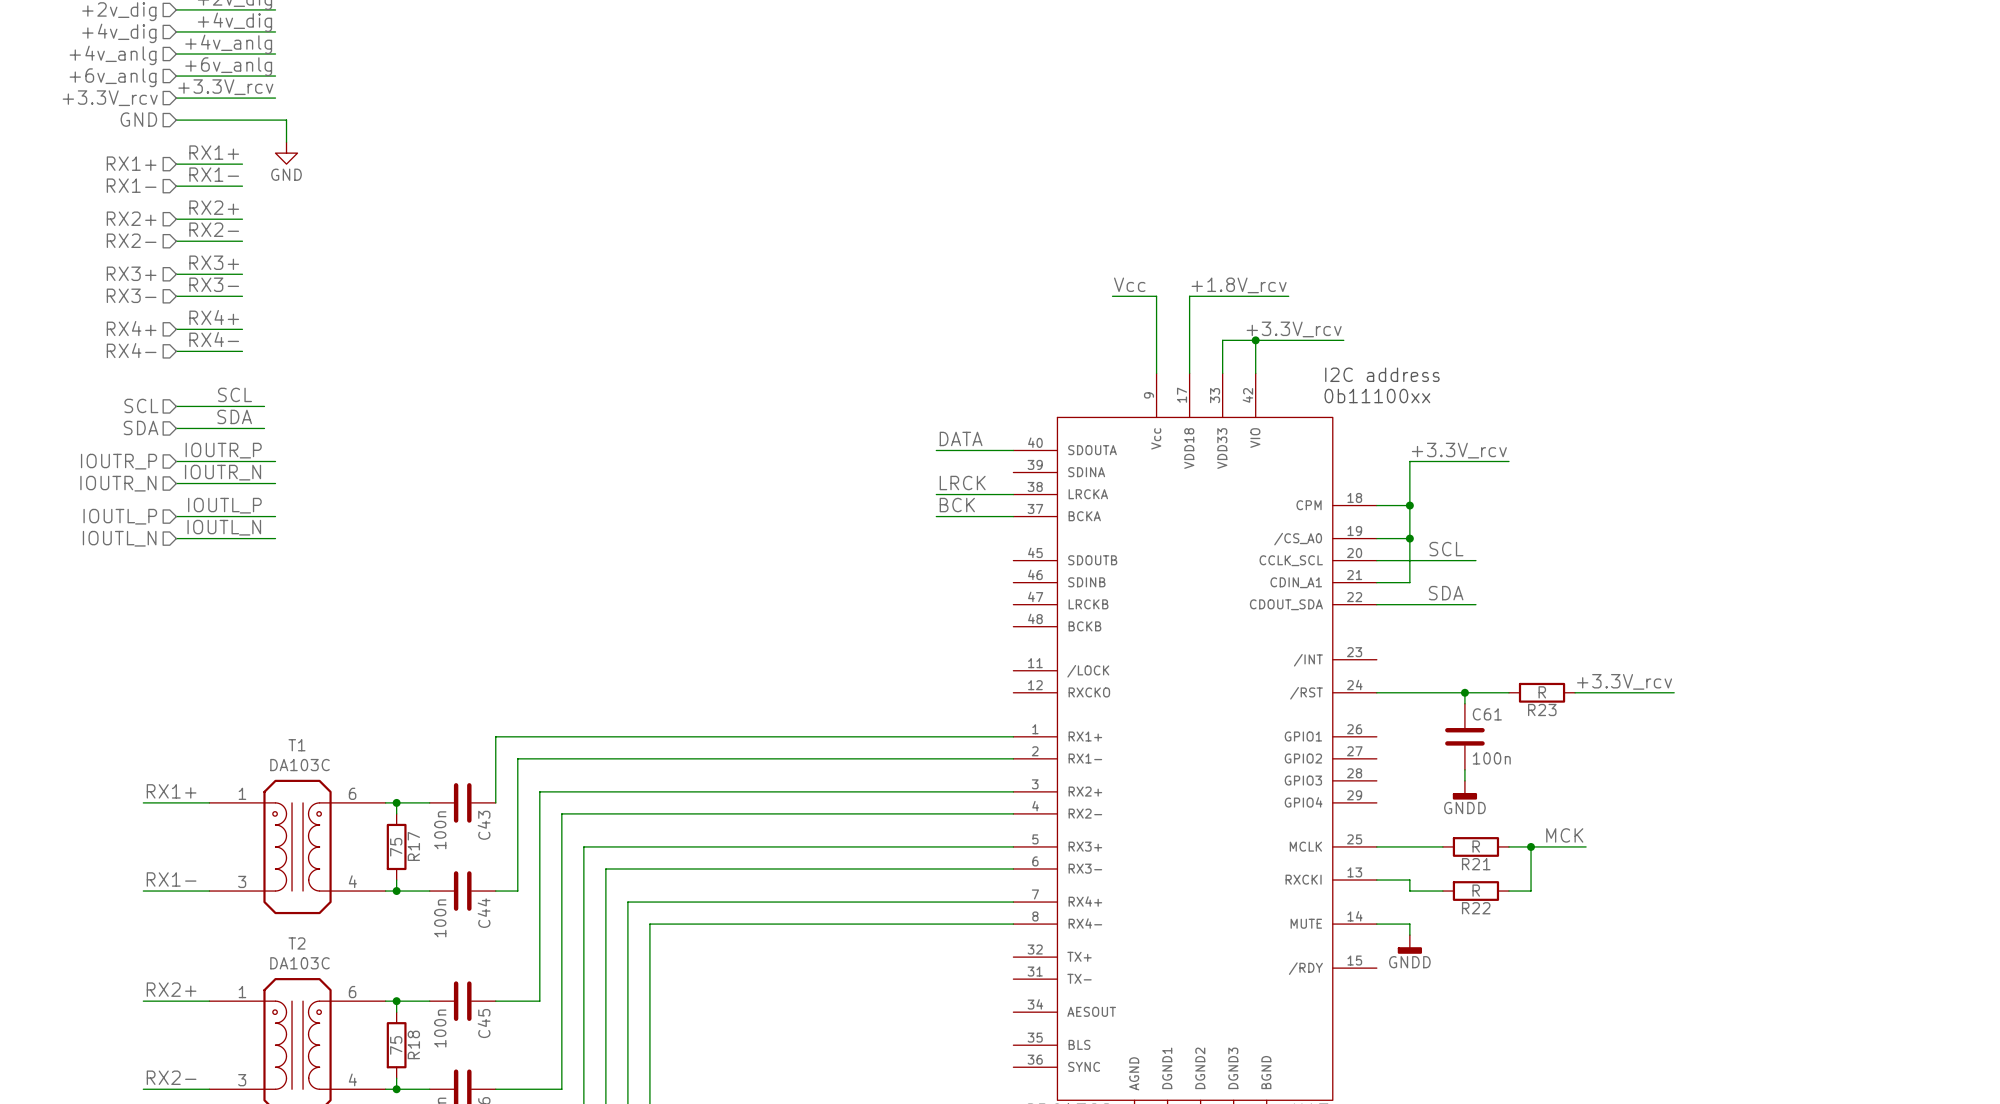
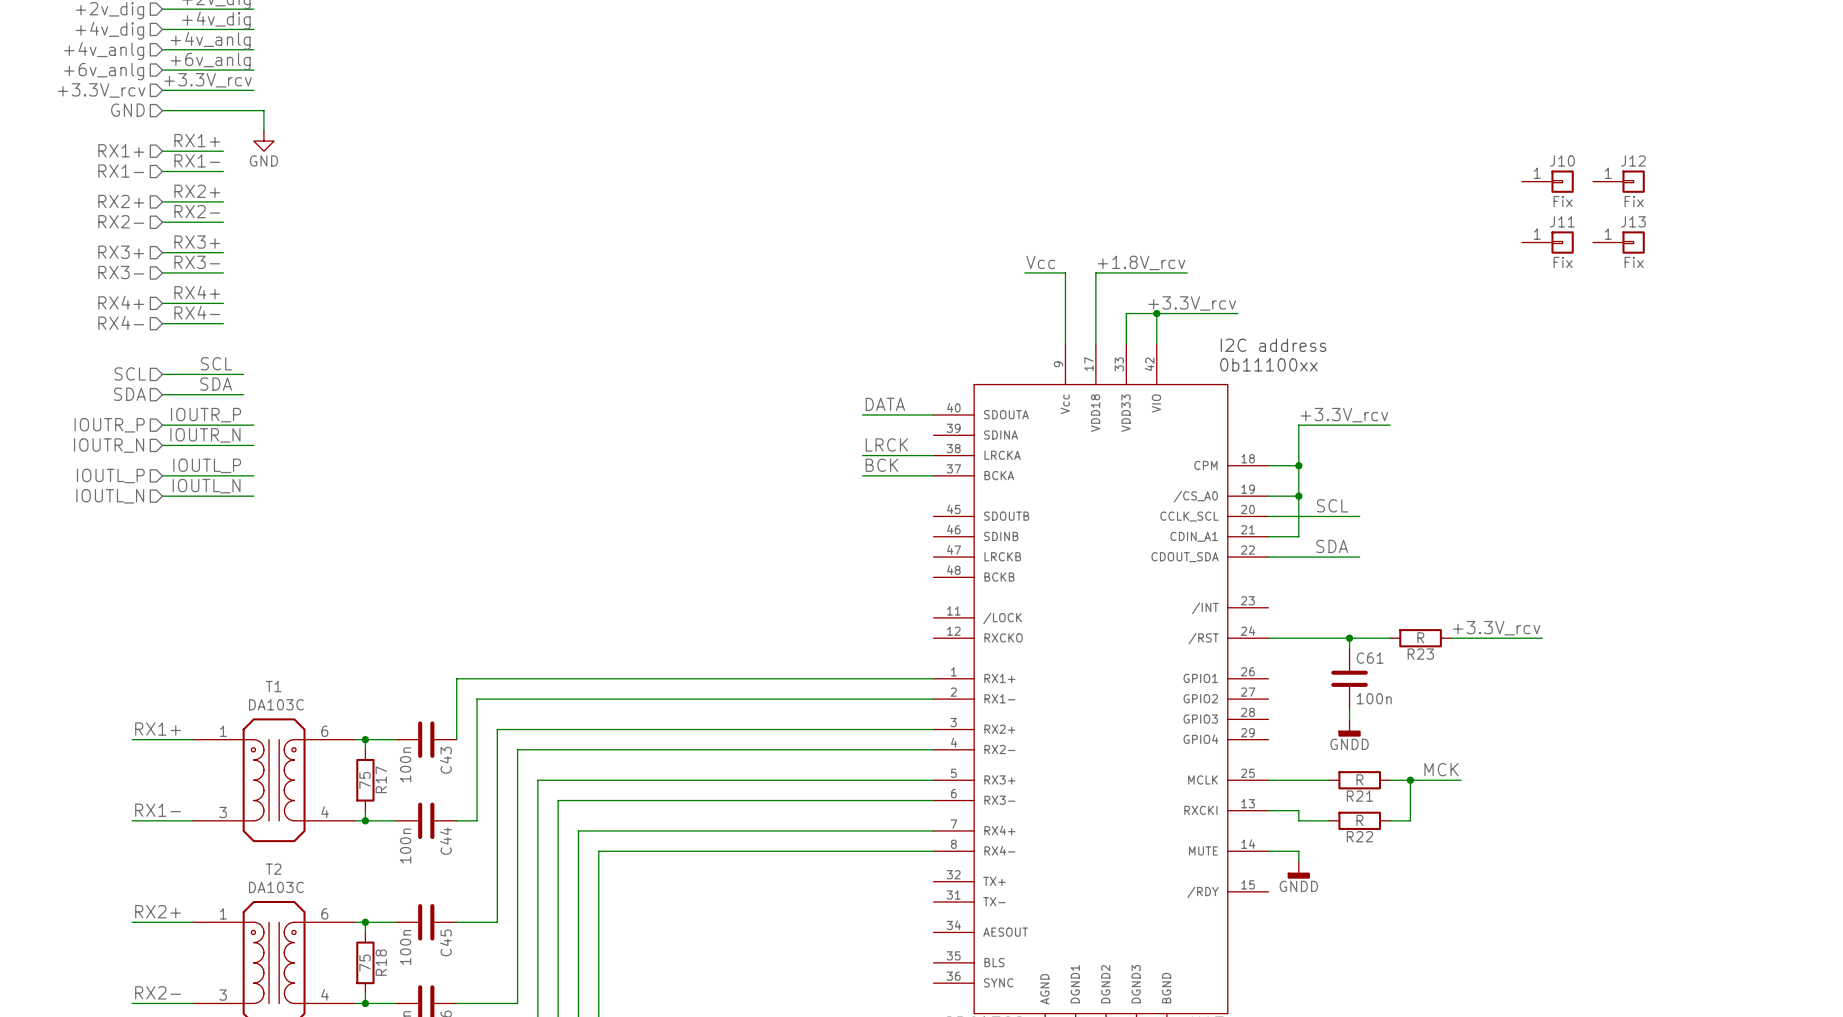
J10: none -> Fix (1547, 181)
J12: none -> Fix (1618, 181)
J11: none -> Fix (1547, 242)
J13: none -> Fix (1618, 242)

